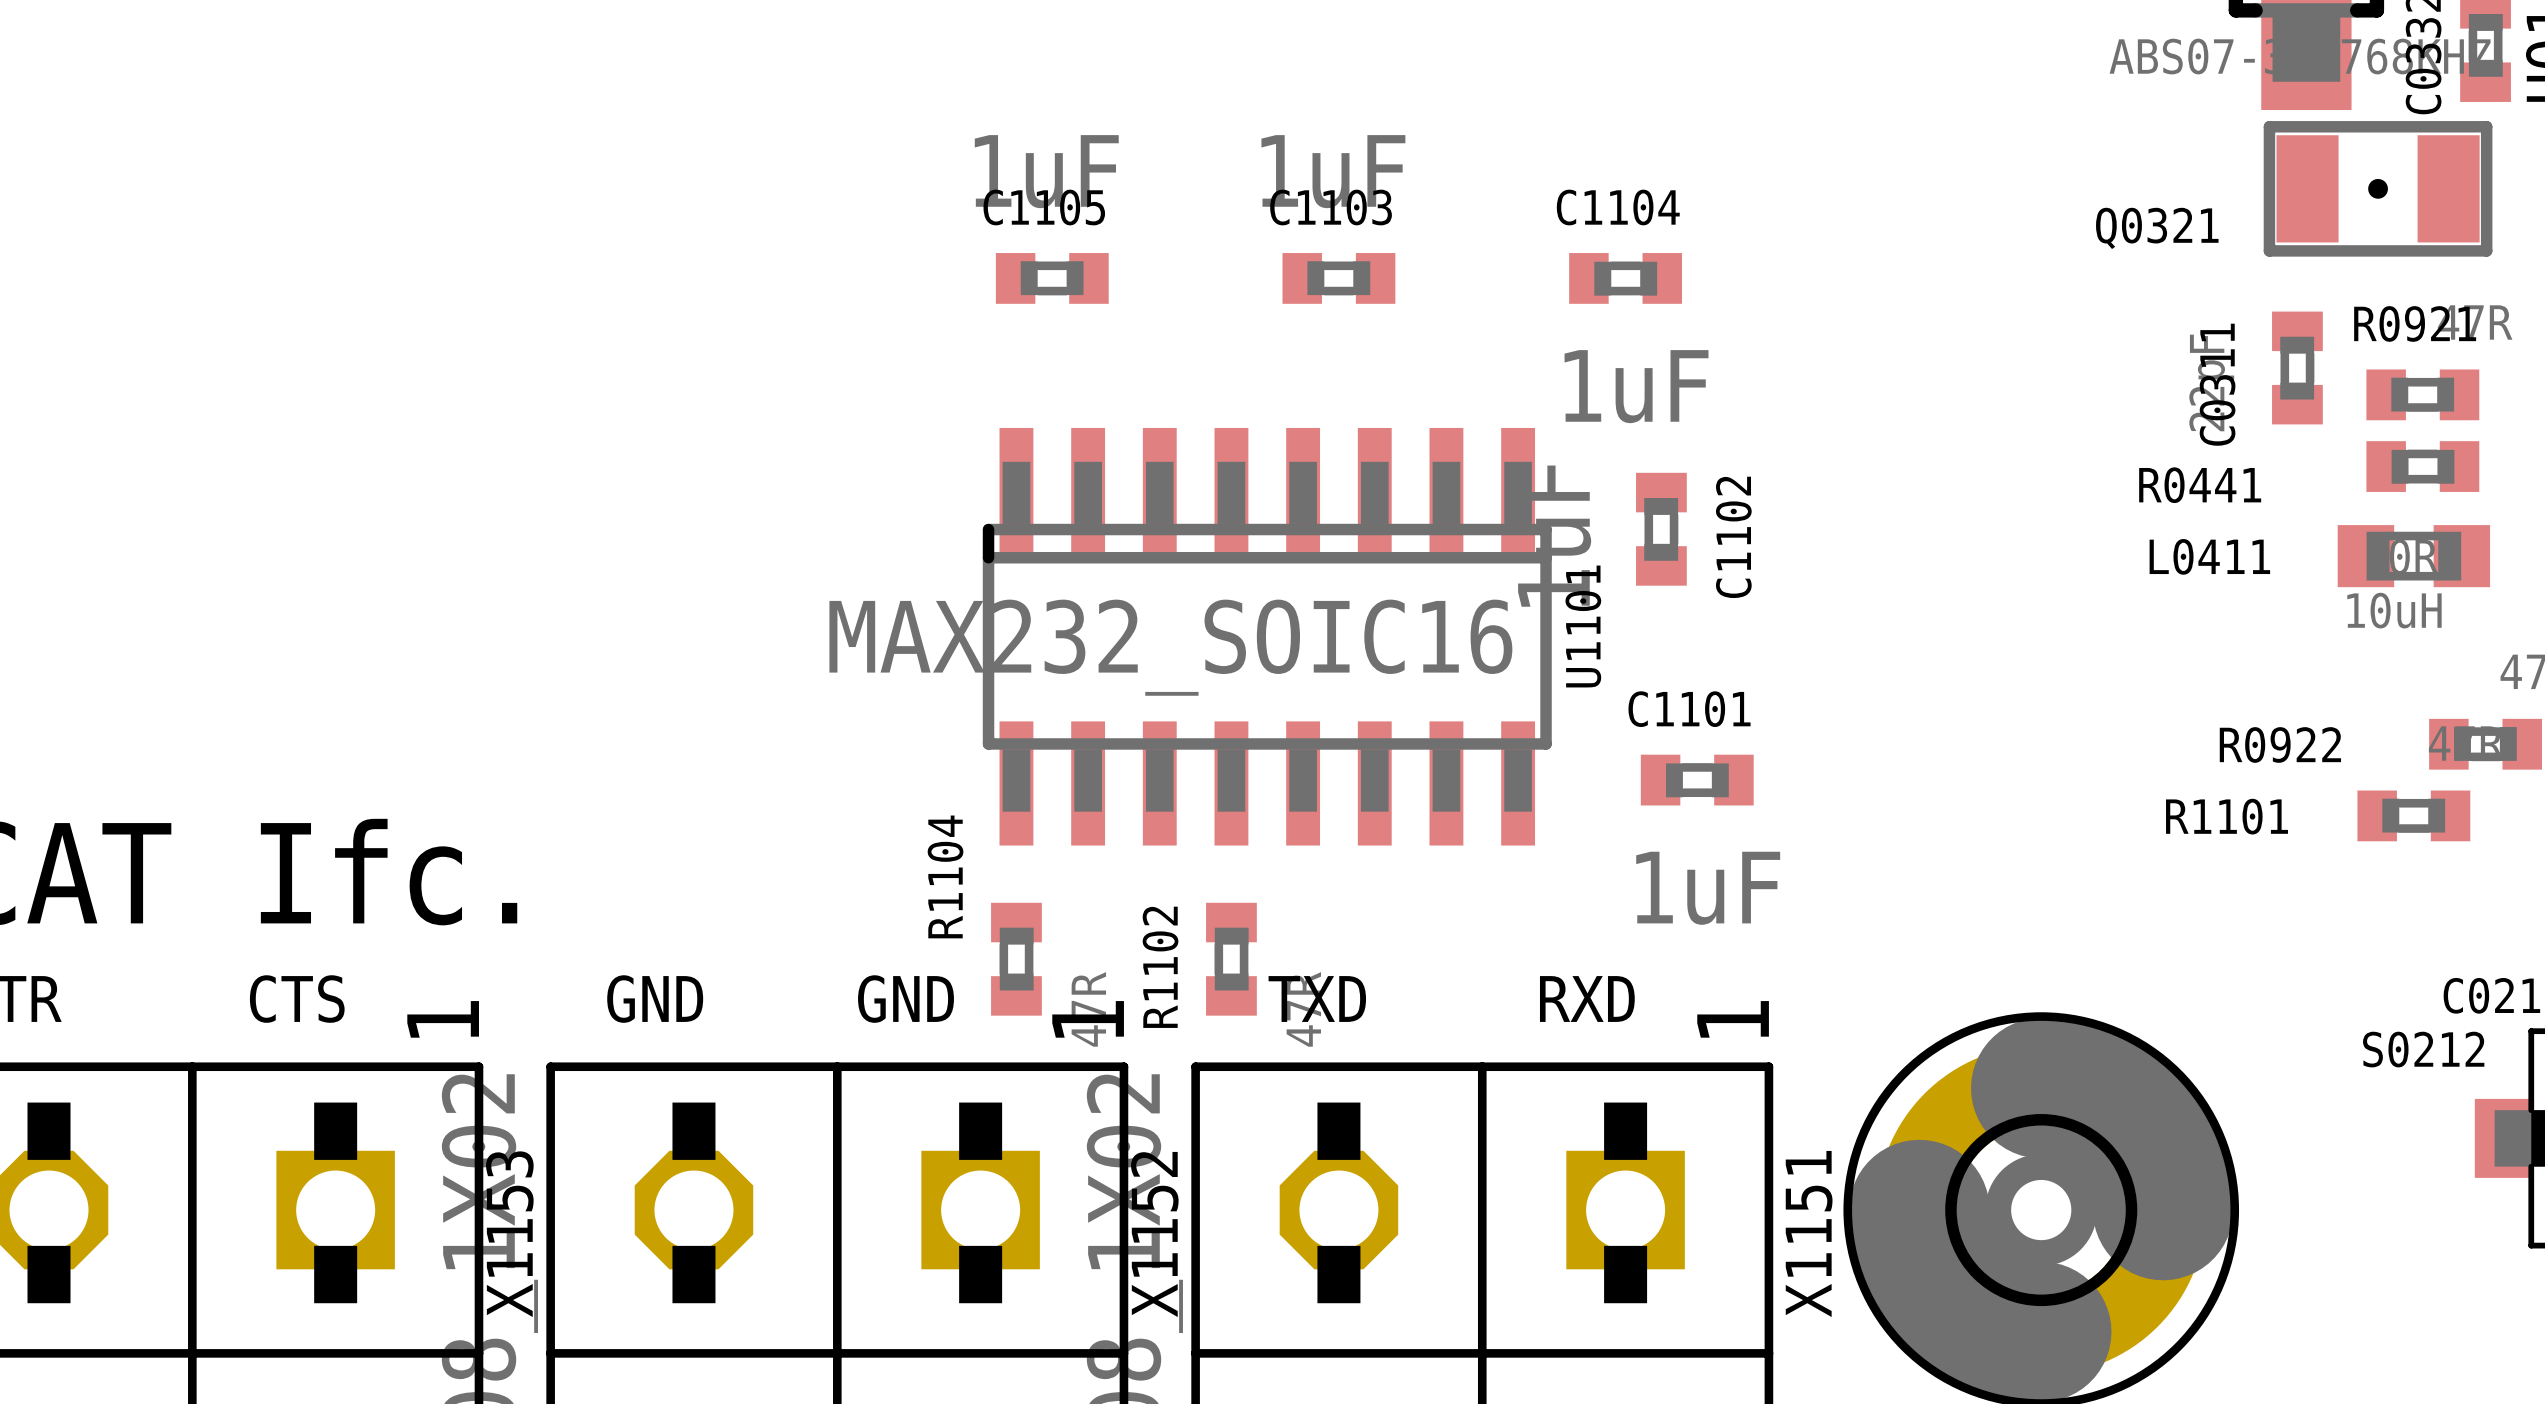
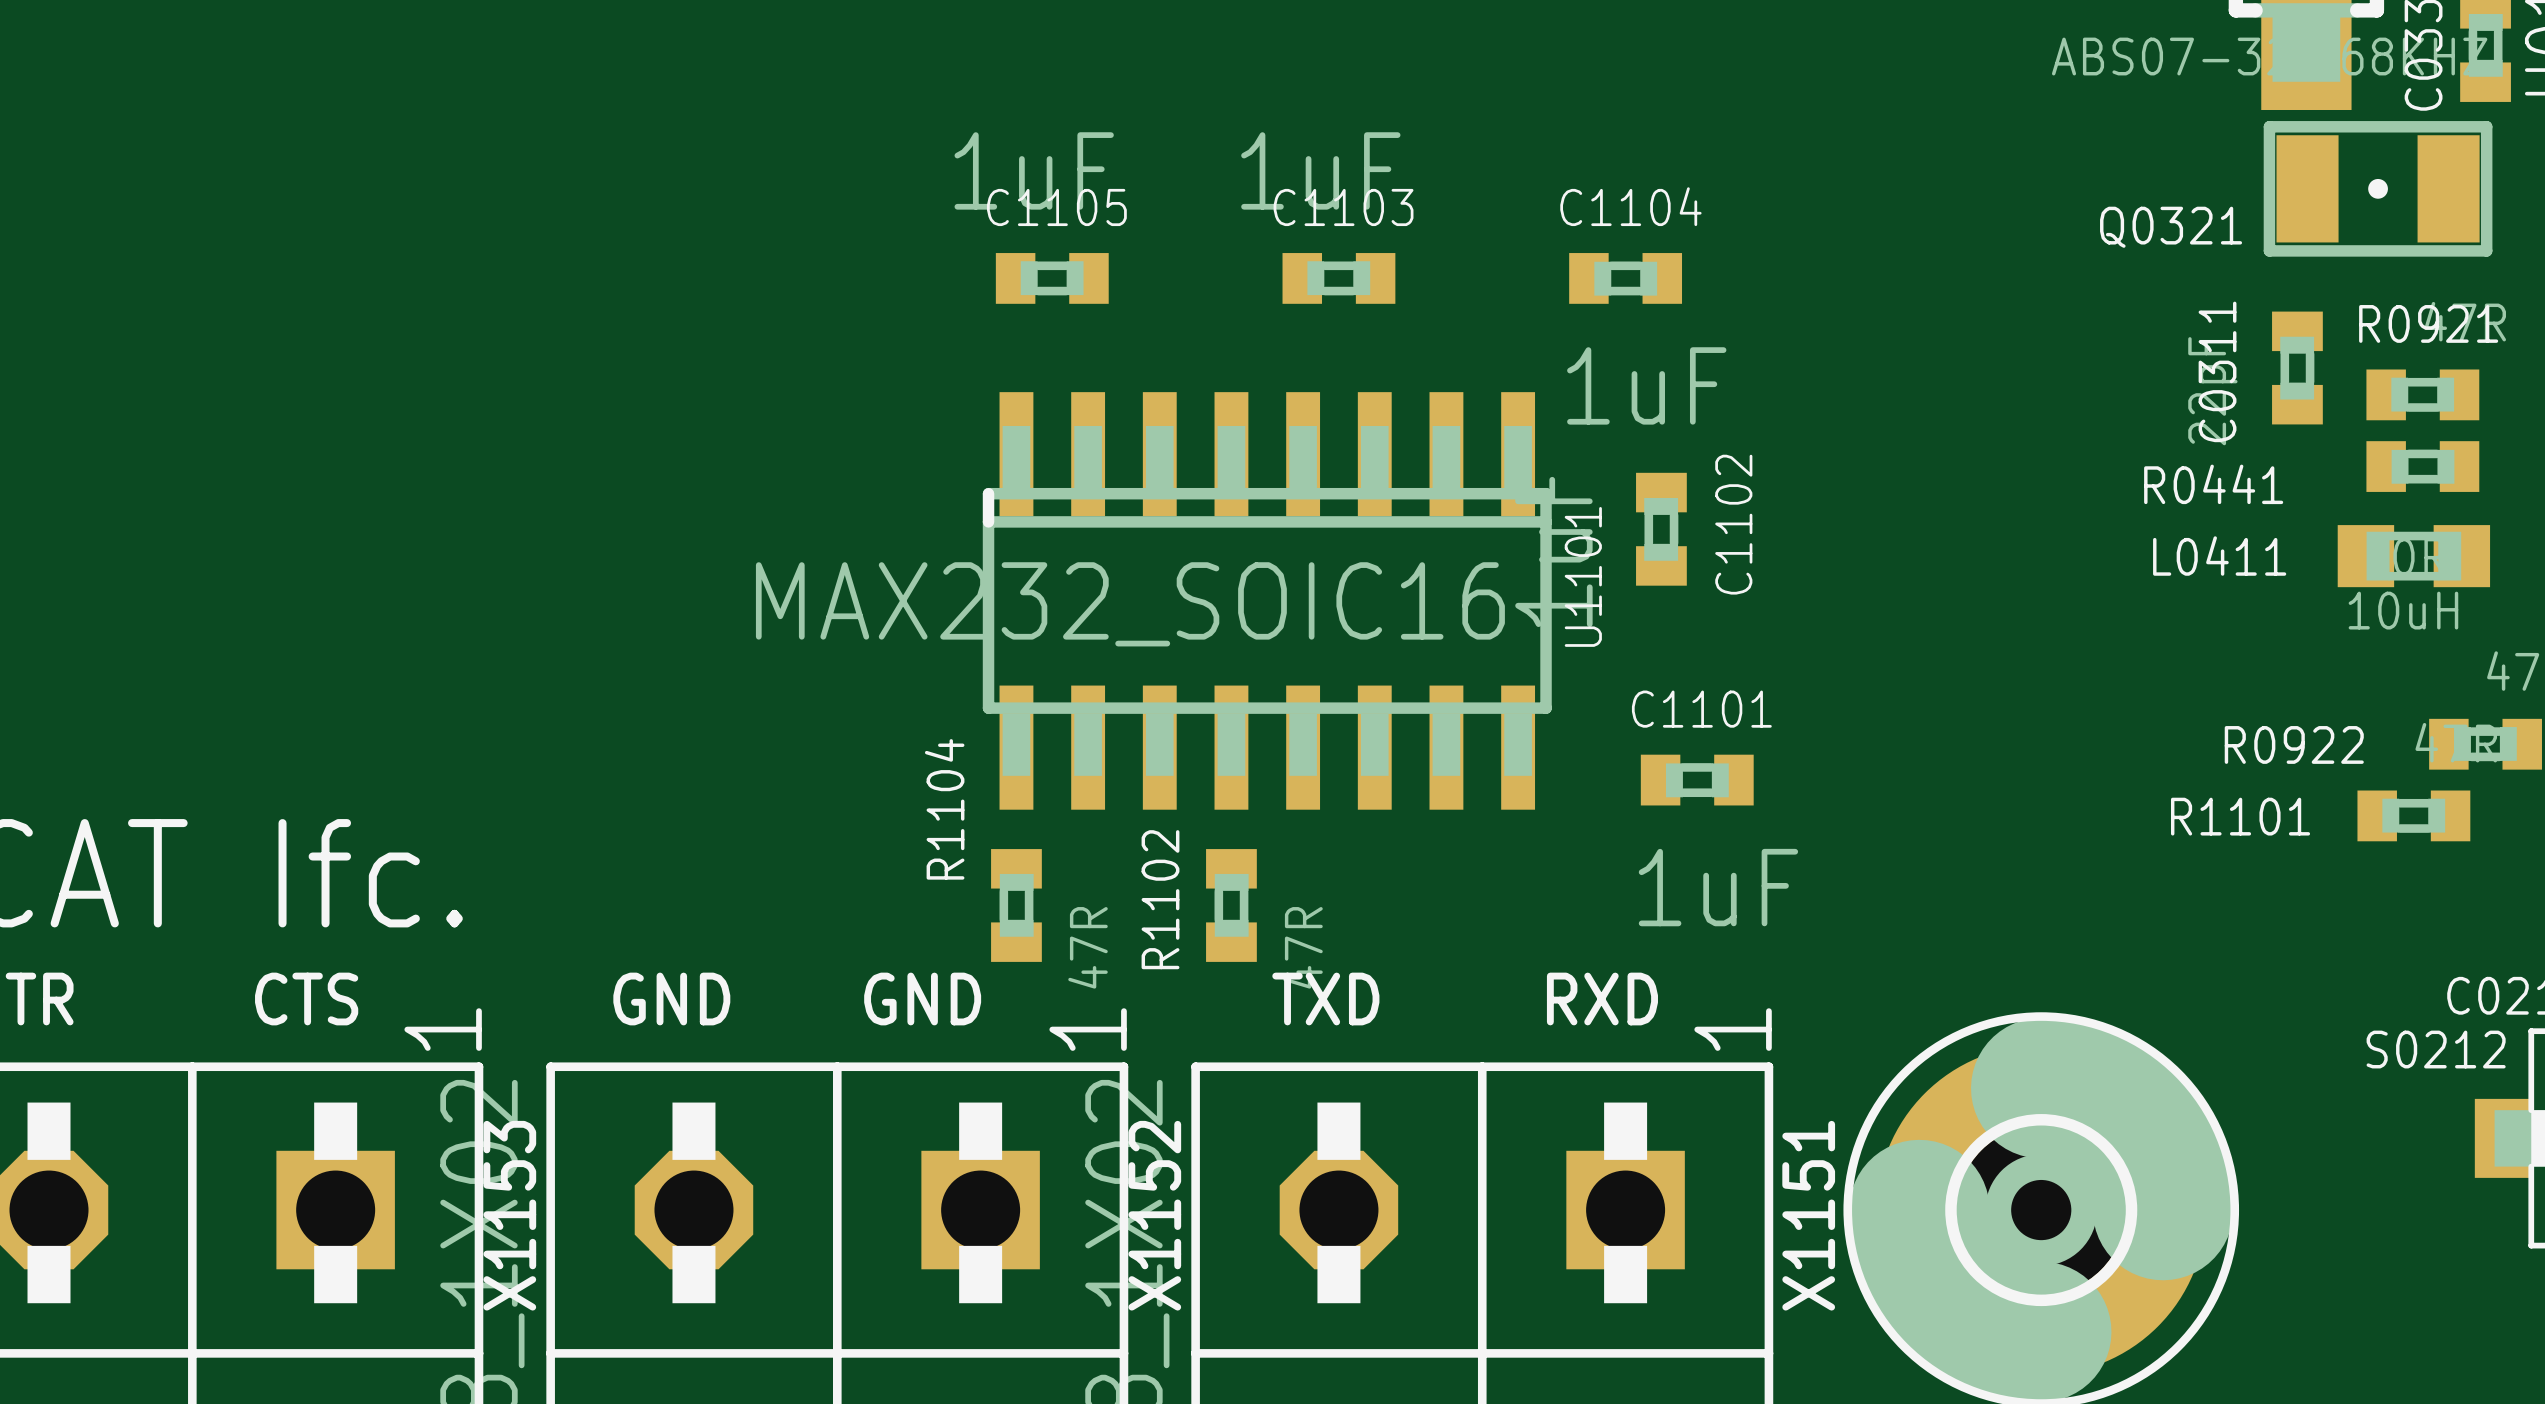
U1101 position: (1267, 636) -> (1267, 600)
R1104 position: (1016, 959) -> (1016, 905)
R1102 position: (1231, 959) -> (1231, 905)

